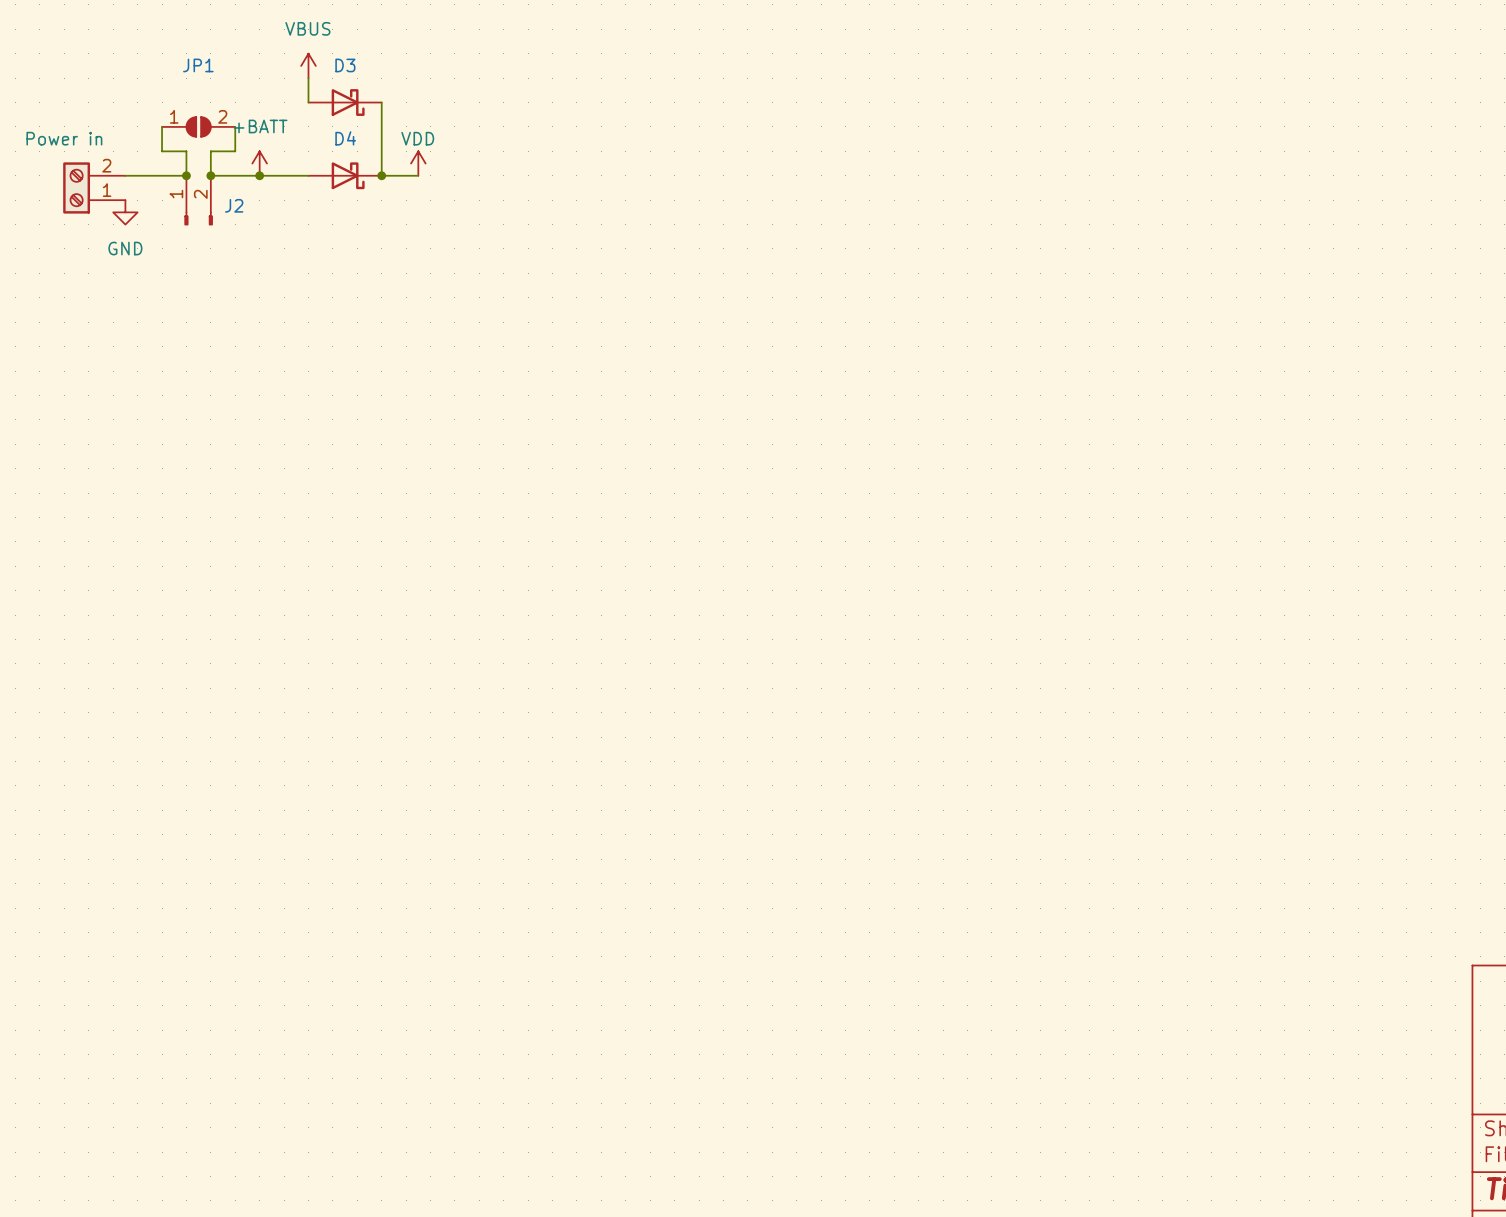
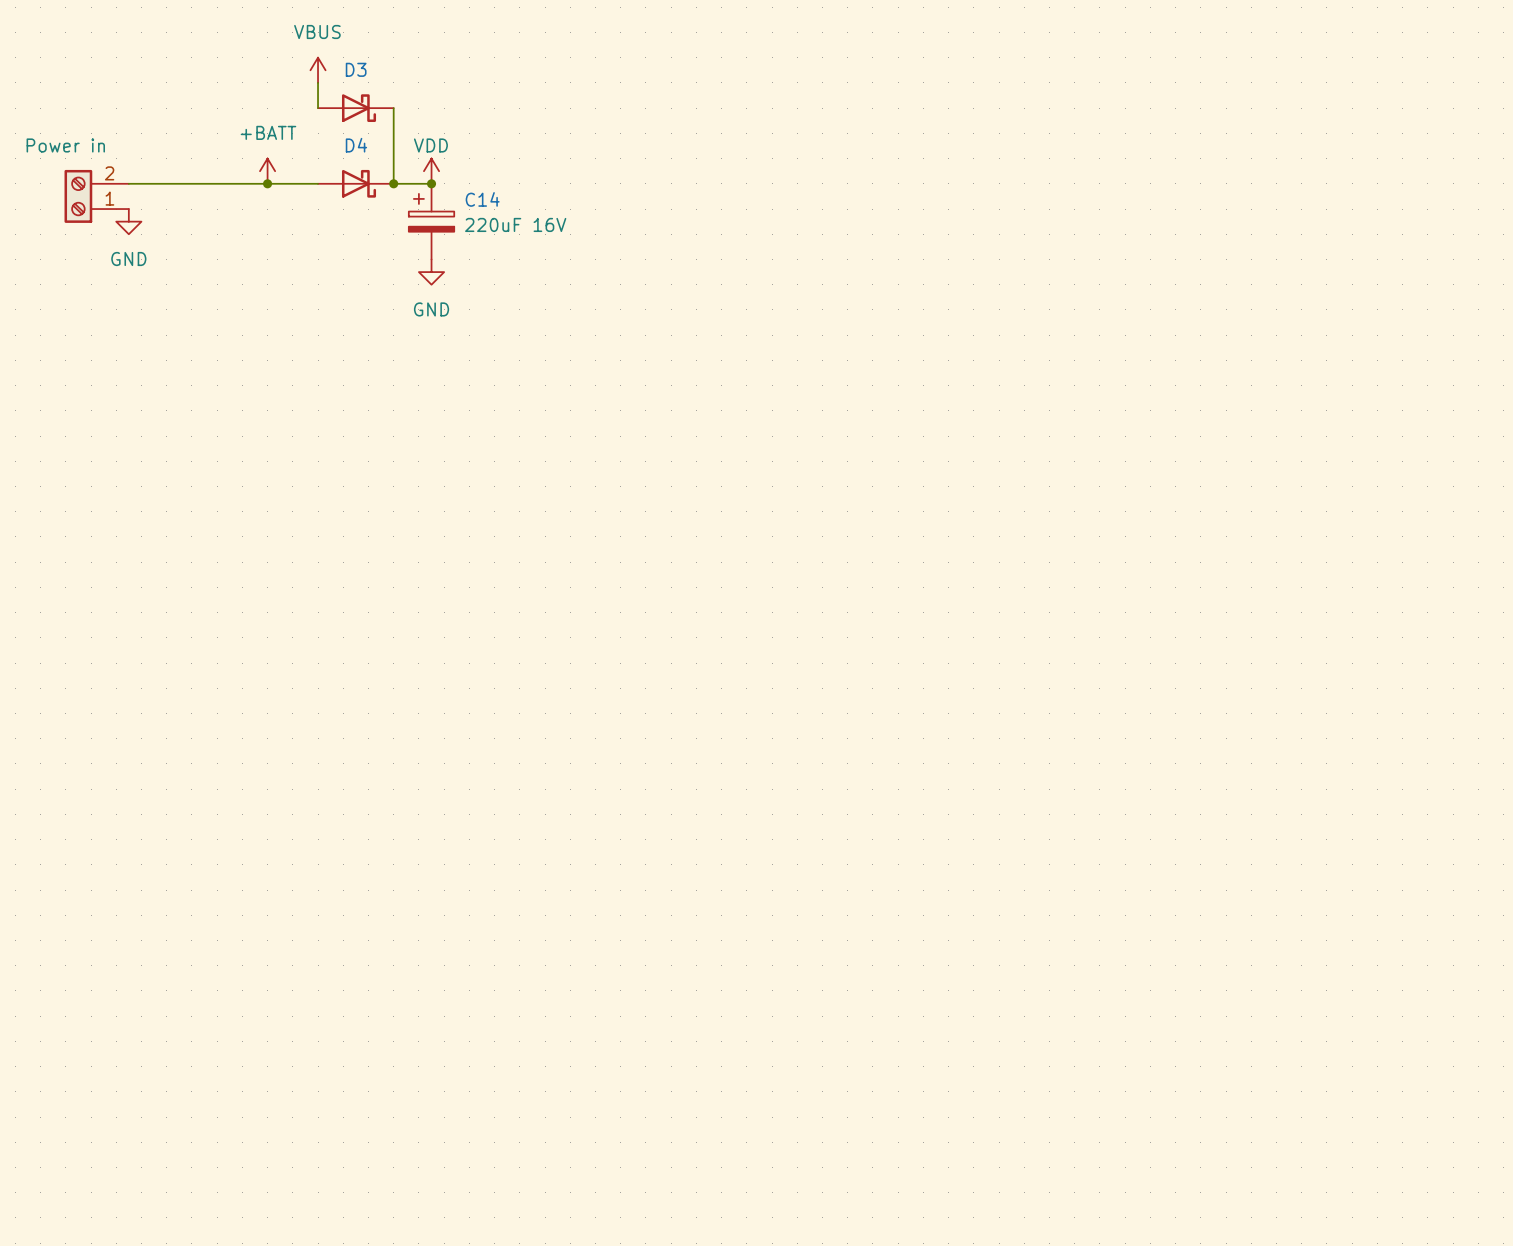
wire: (162, 126) (162, 151) (186, 151) (186, 175) -> (217, 183) (191, 183)
JP1: (198, 126) -> none
wire: (235, 126) (235, 151) (210, 151) (210, 175) -> none
junction: (186, 175) -> none
junction: (210, 175) -> none
junction: none -> (431, 183)
J2: (198, 200) -> none
C14: none -> 220uF 16V (431, 221)
power symbol: none -> GND (431, 272)

